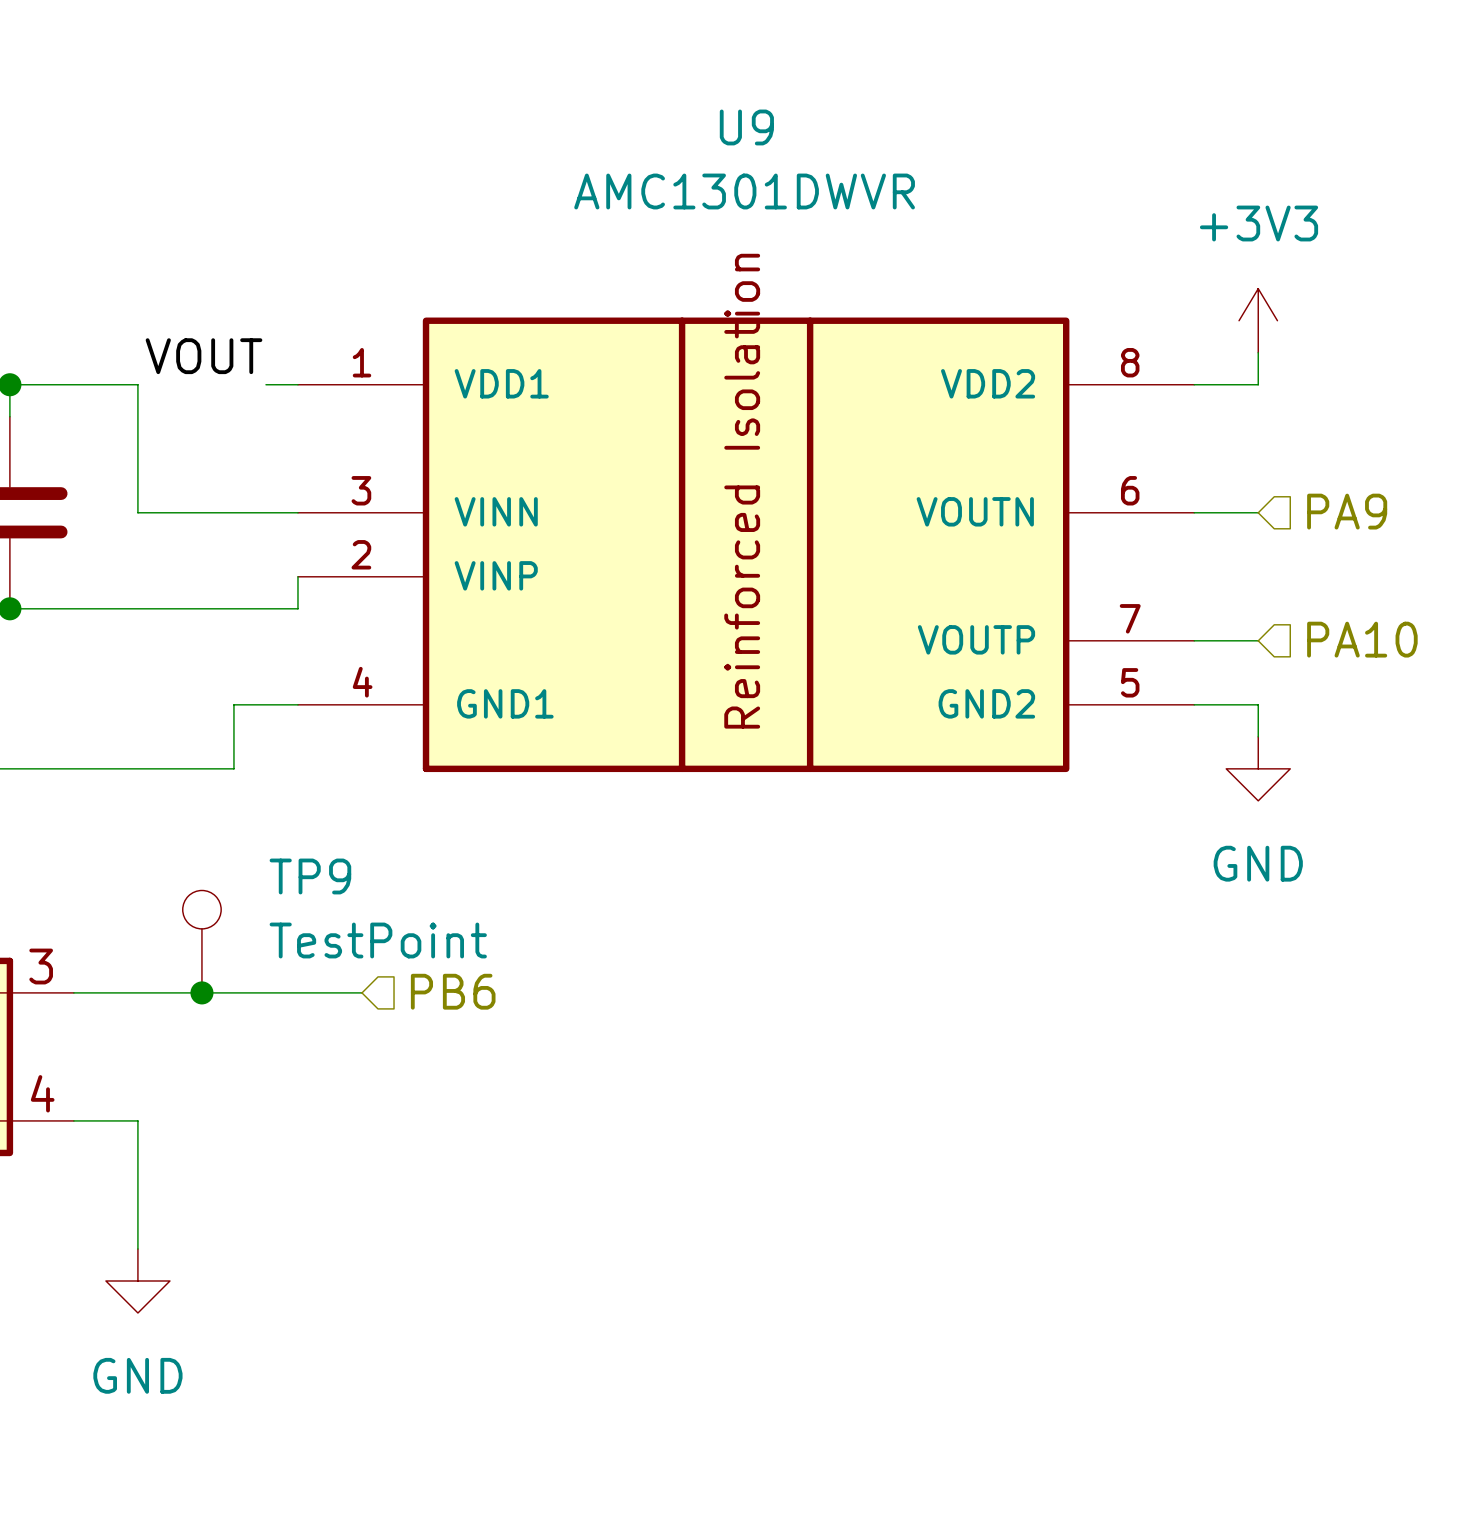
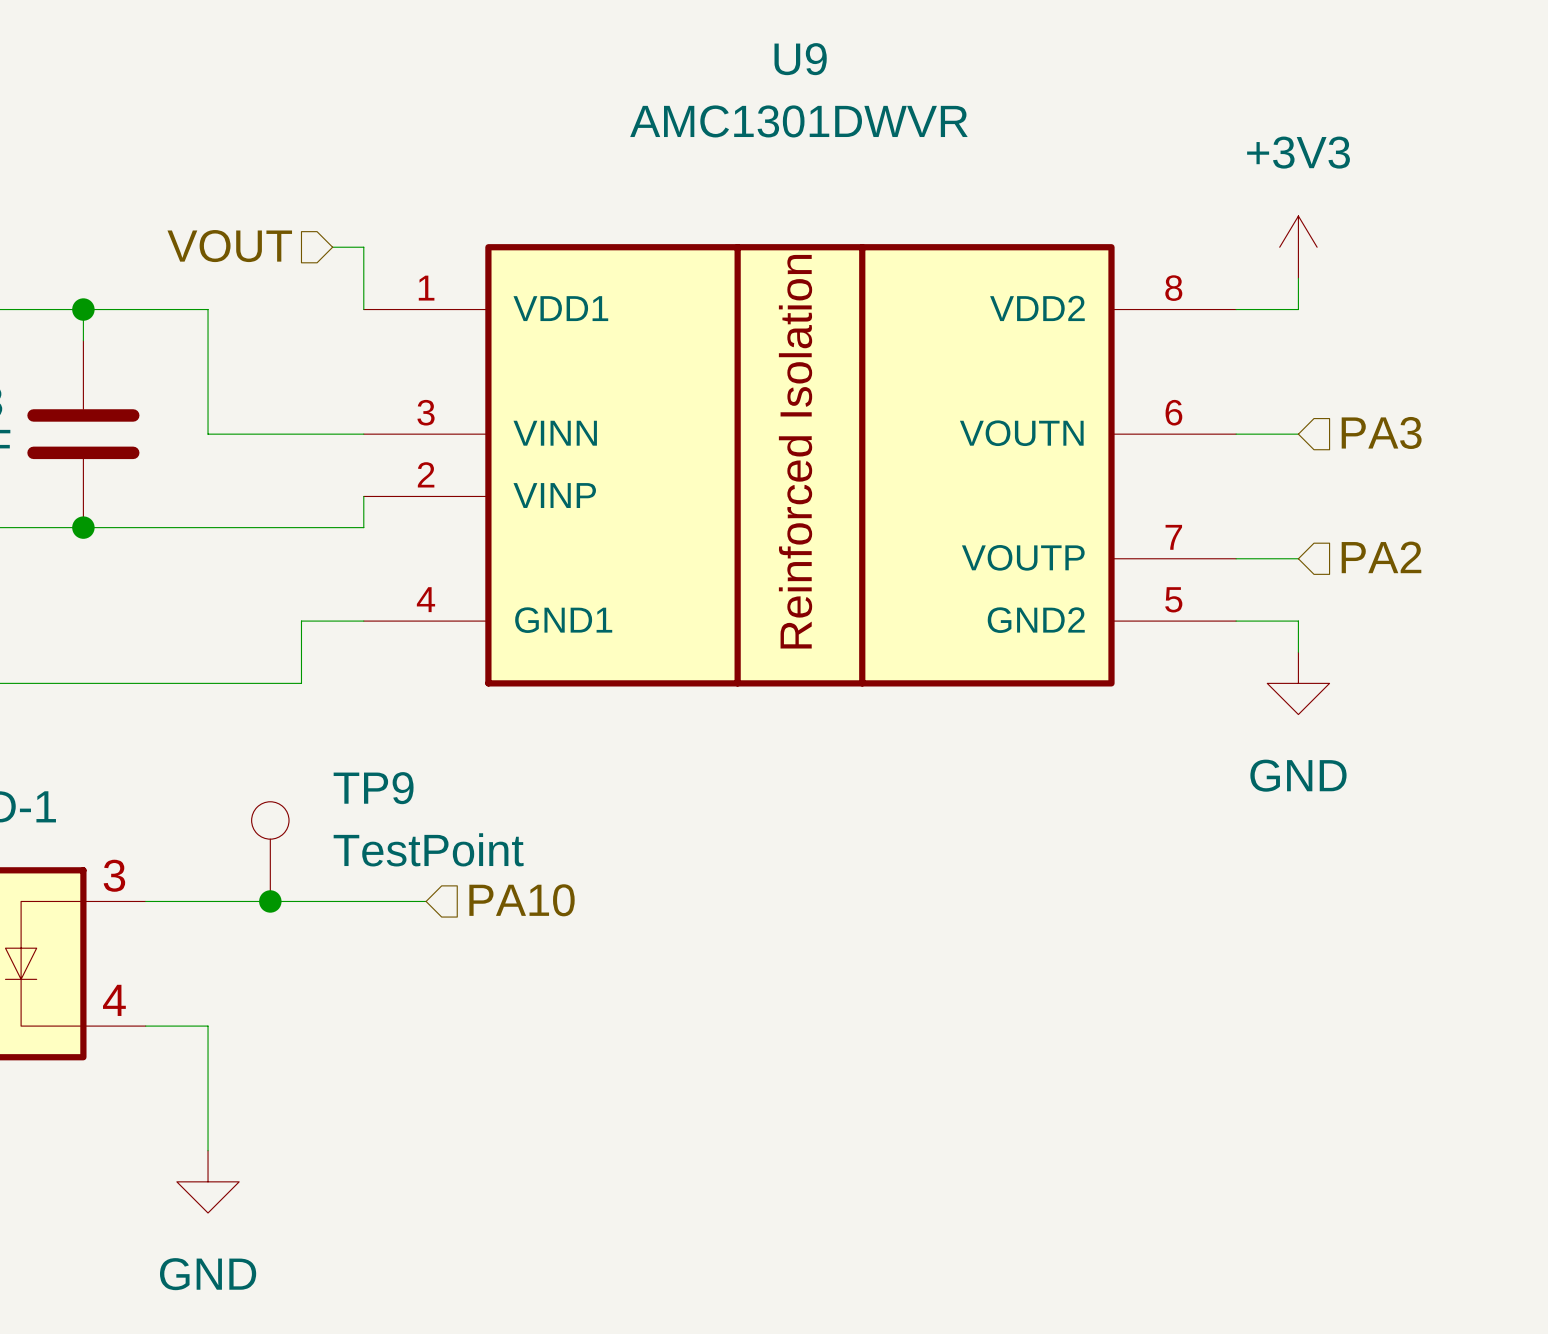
hierarchical label: none -> VOUT (229, 246)
label: VOUT (204, 356) -> none
wire: (265, 384) (297, 384) -> (332, 247) (363, 247) (363, 309)
hierarchical label: PA9 (1347, 511) -> PA3 (1381, 432)
hierarchical label: PA10 (1362, 639) -> PA2 (1381, 557)
hierarchical label: PB6 (453, 991) -> PA10 (522, 900)

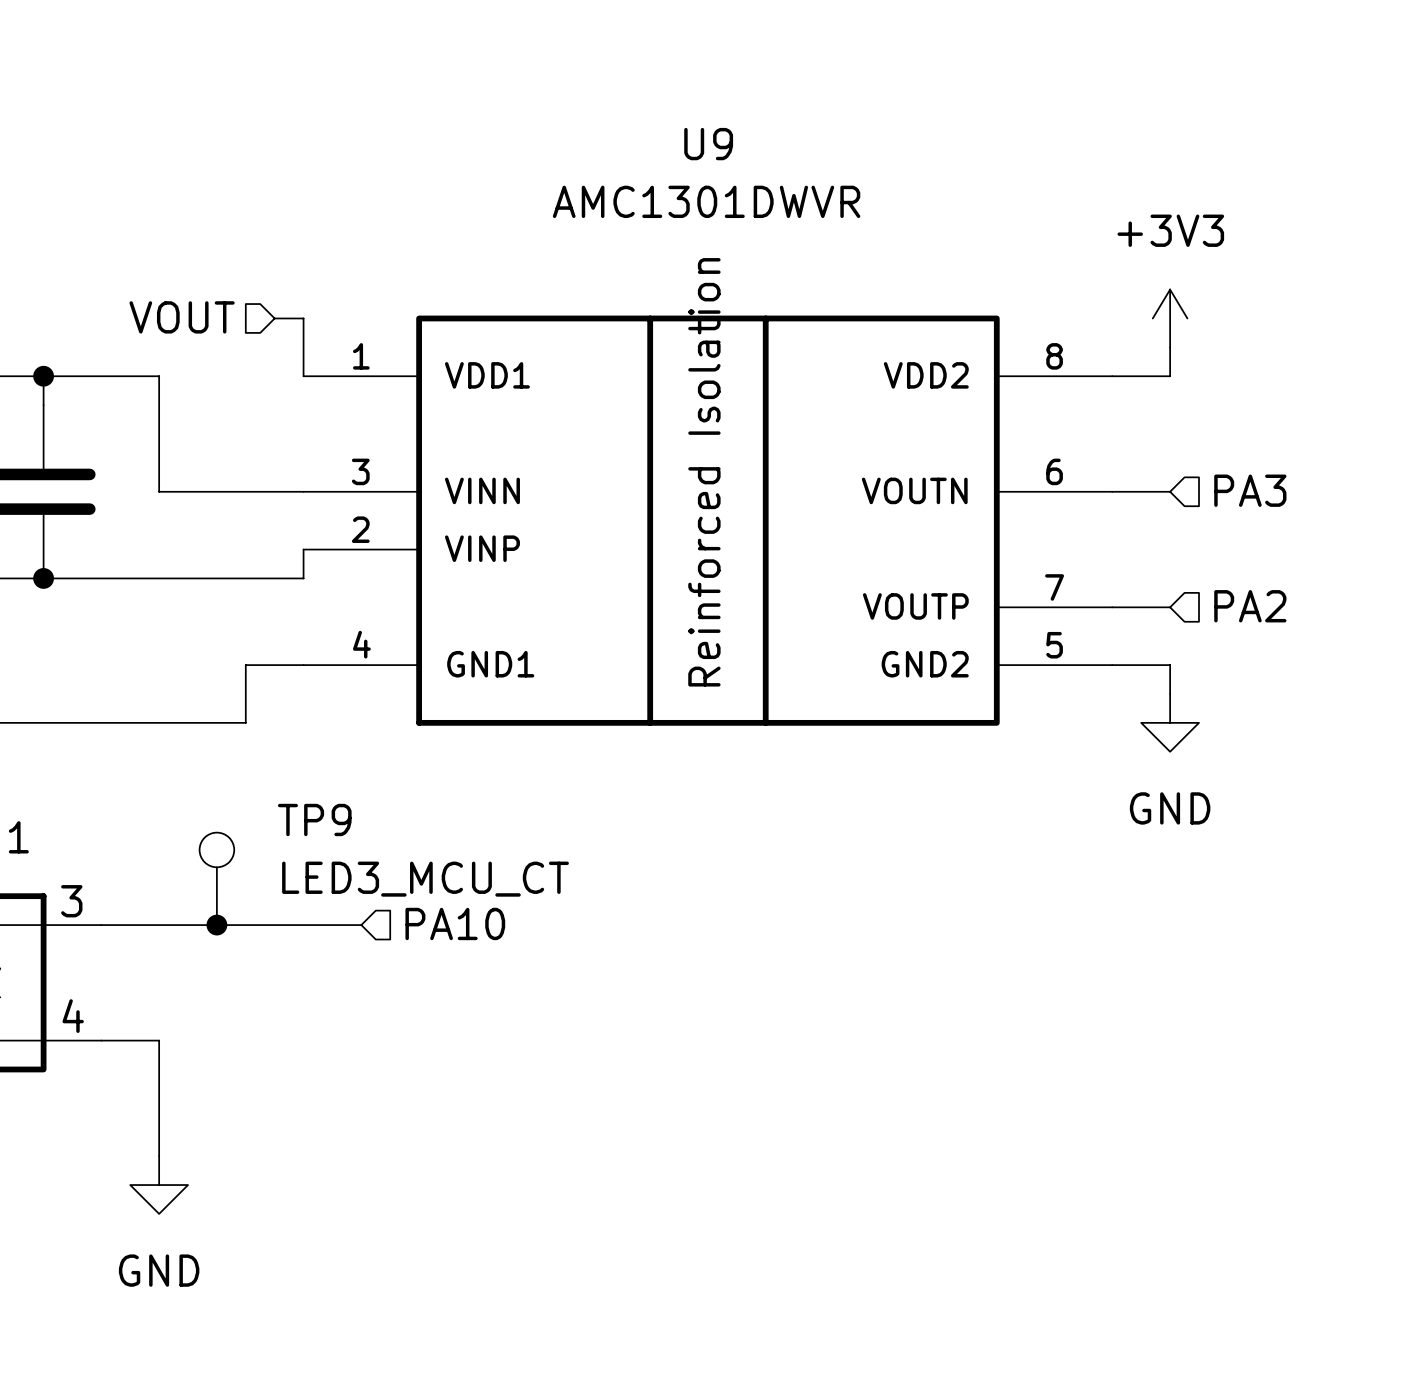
TP9 value: TestPoint (428, 849) -> LED3_MCU_CT (425, 879)

